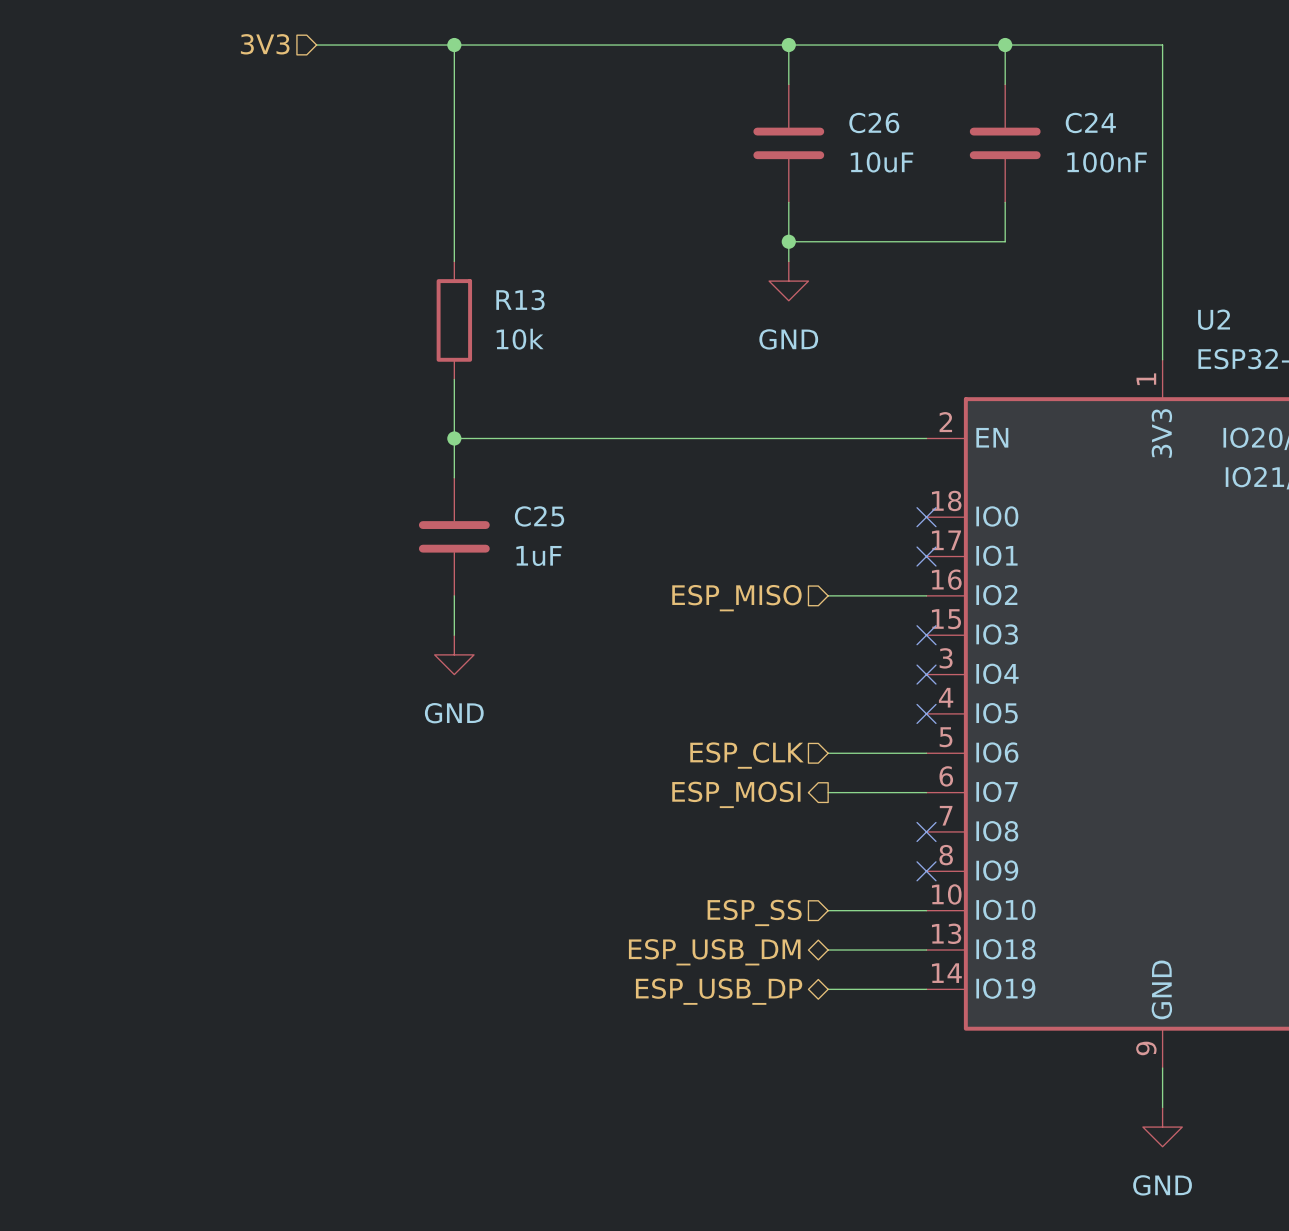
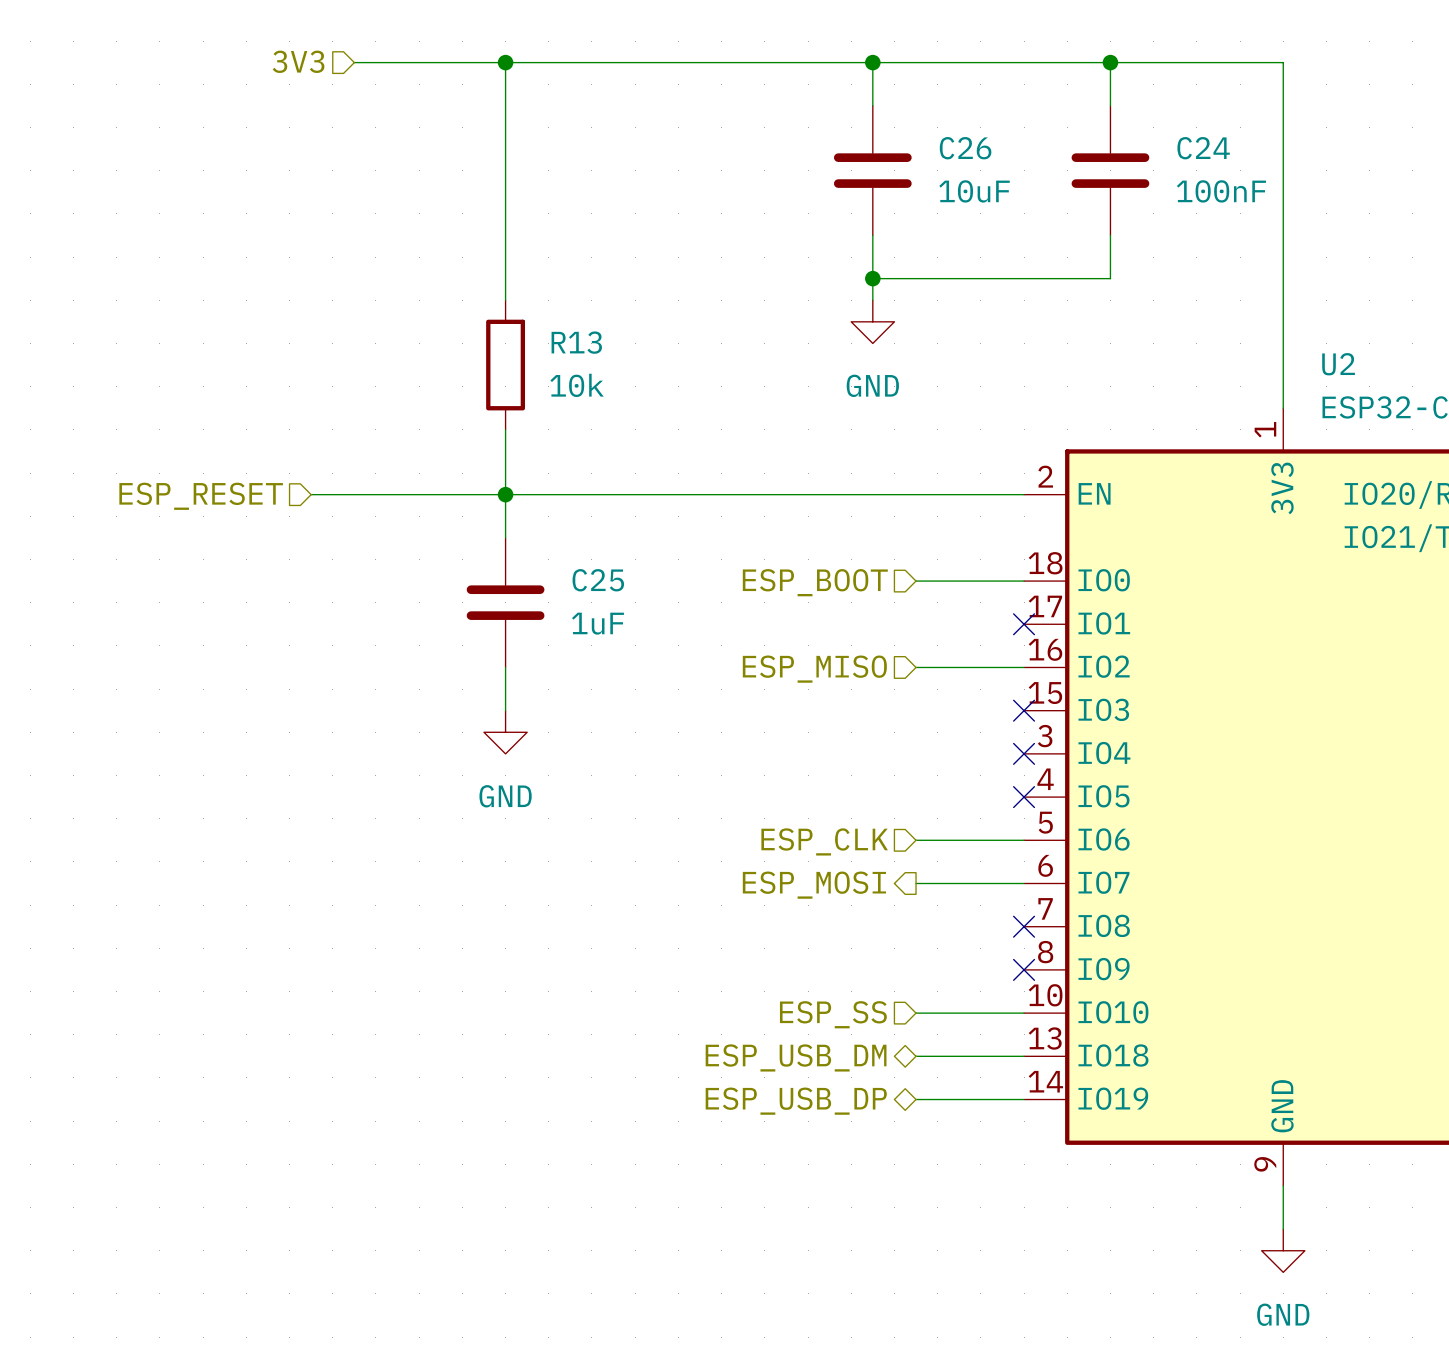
wire: none -> (311, 494) (505, 494)
hierarchical label: none -> ESP_RESET (201, 496)
wire: none -> (916, 581) (1024, 581)
no-connect mark: (926, 517) -> none
hierarchical label: none -> ESP_BOOT (815, 582)

